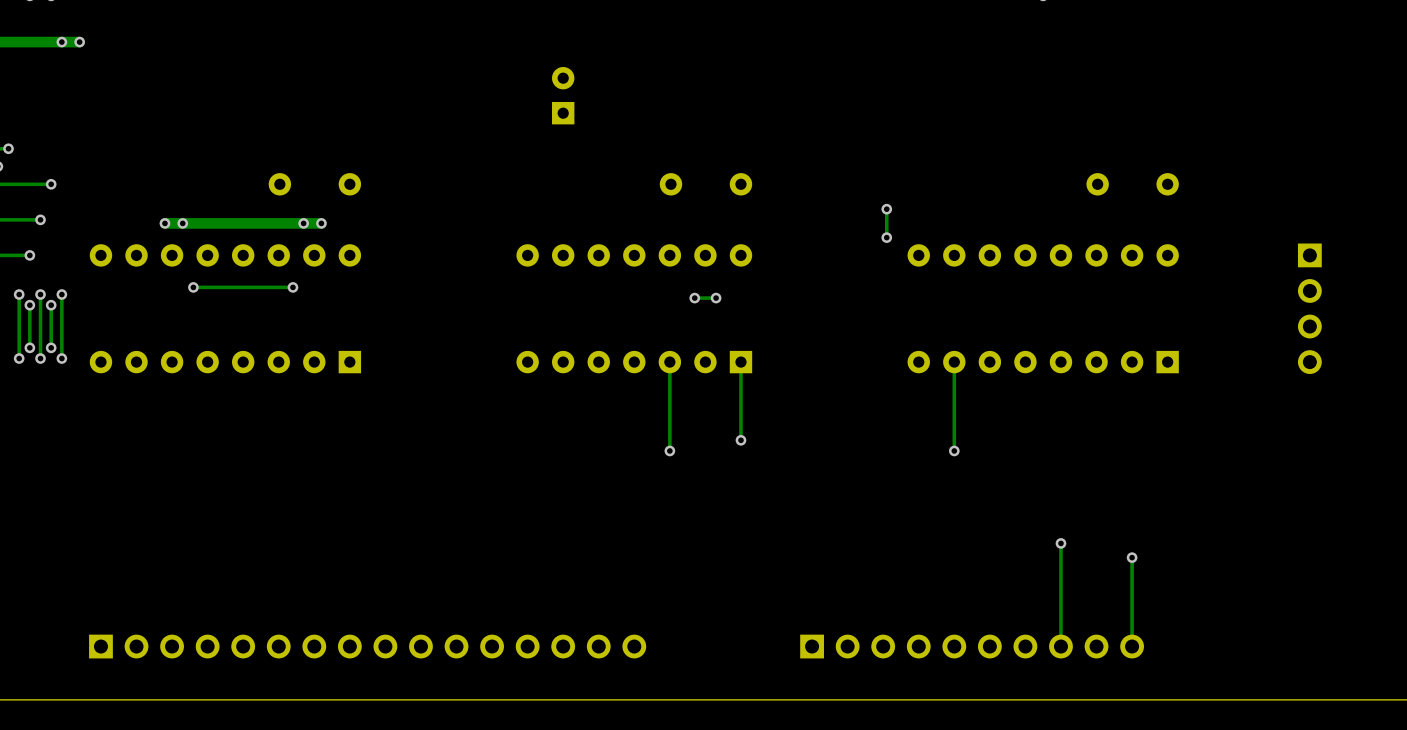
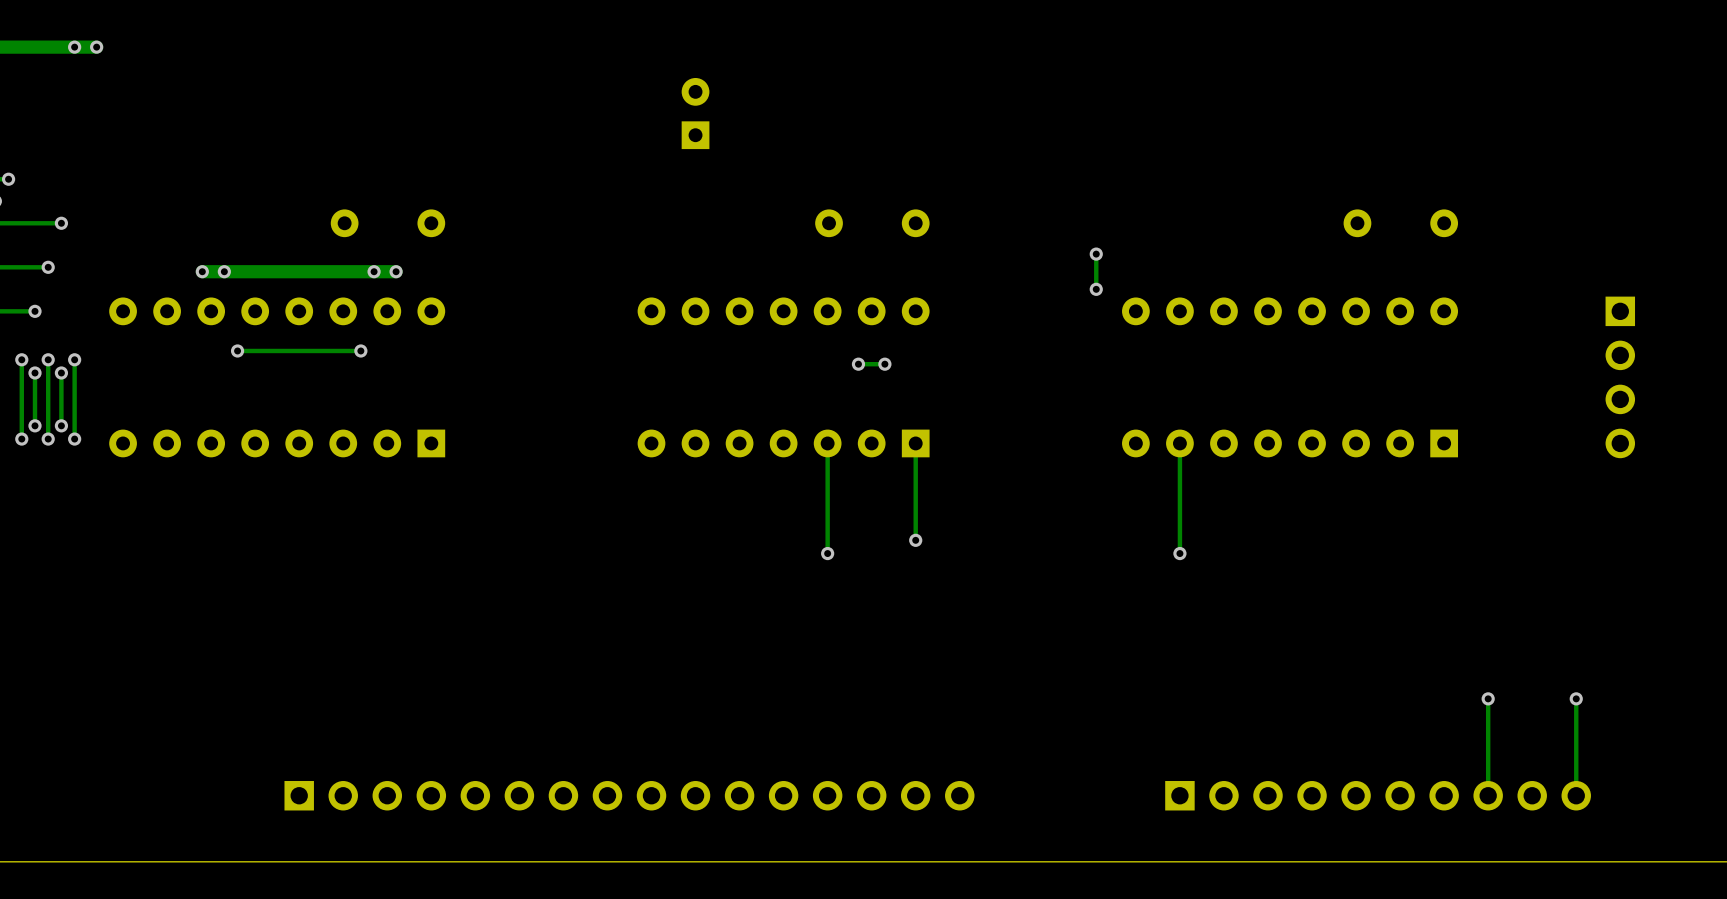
track: (1060, 543) (1060, 646) -> none
via: (1060, 543) -> none
track: (1132, 557) (1132, 646) -> none
via: (1132, 557) -> none
track: none -> (1488, 698) (1488, 795)
via: none -> (1488, 698)
track: none -> (1576, 698) (1576, 795)
via: none -> (1576, 698)
part position: (367, 646) -> (629, 795)
part position: (972, 646) -> (1378, 795)

